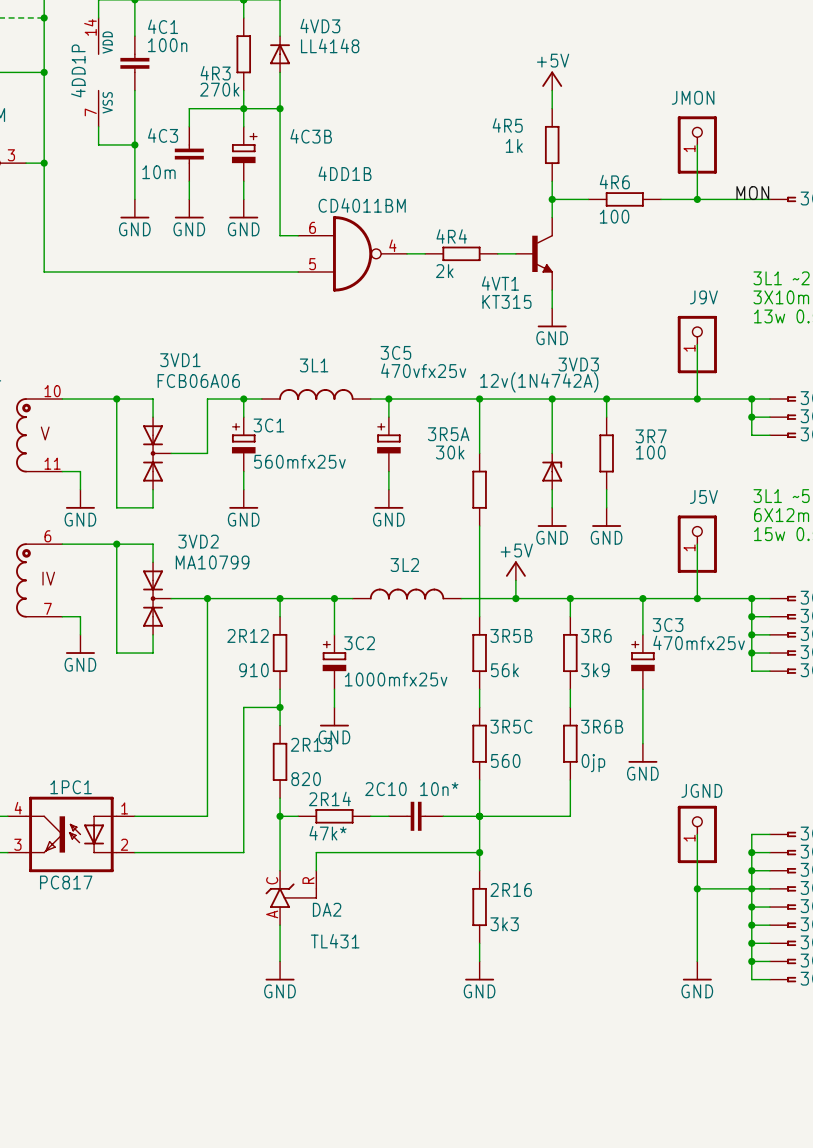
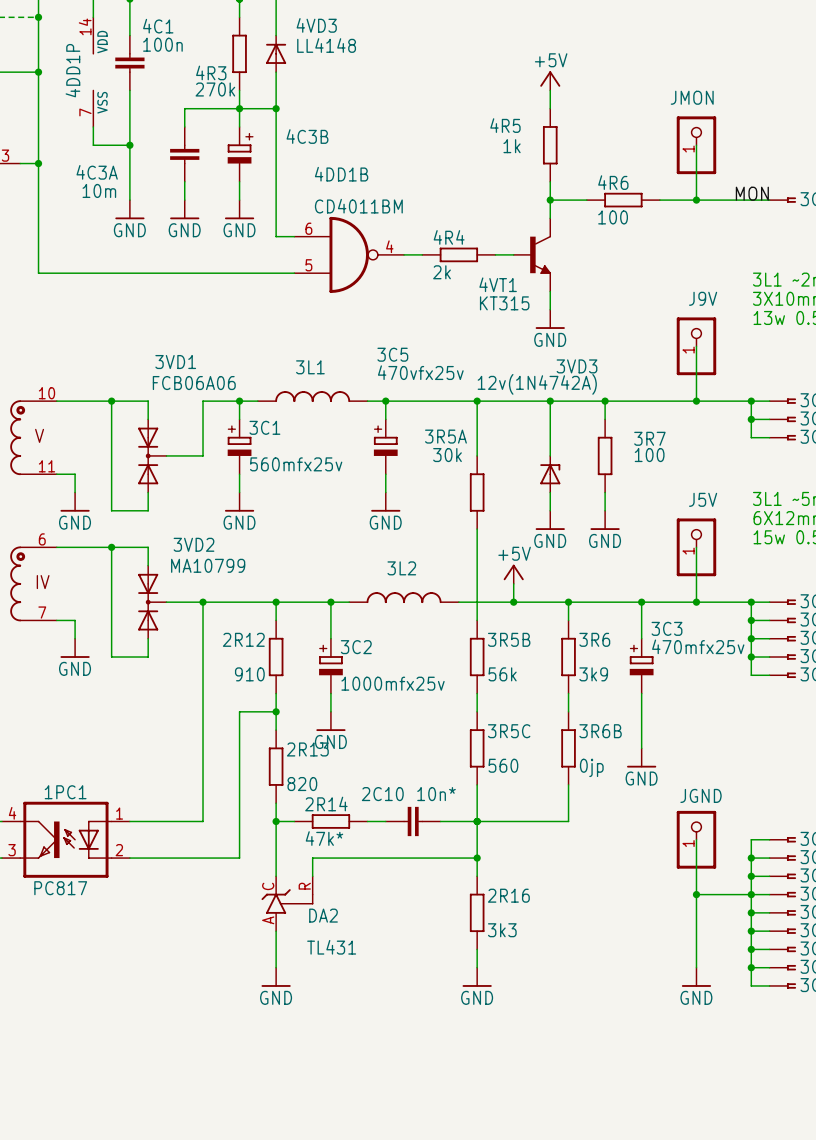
4C3 name: 4C3 (163, 135) -> 4C3A (97, 172)
4C3 value position: 10m (158, 172) -> 10m (99, 190)

